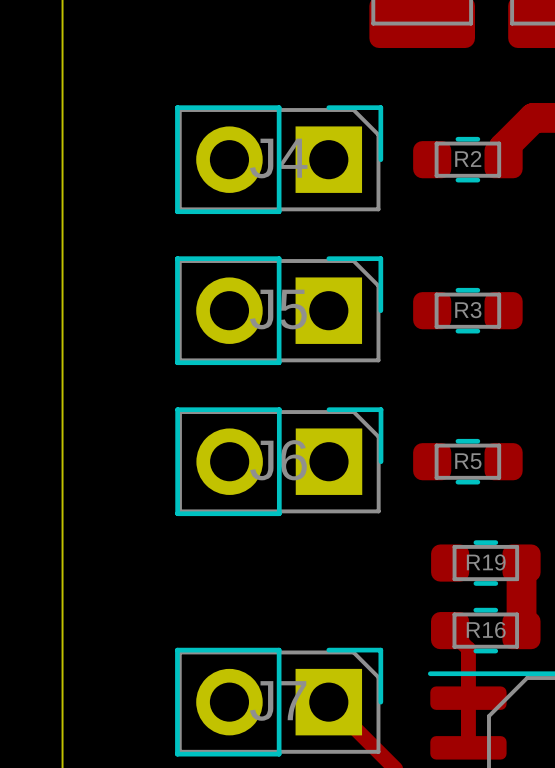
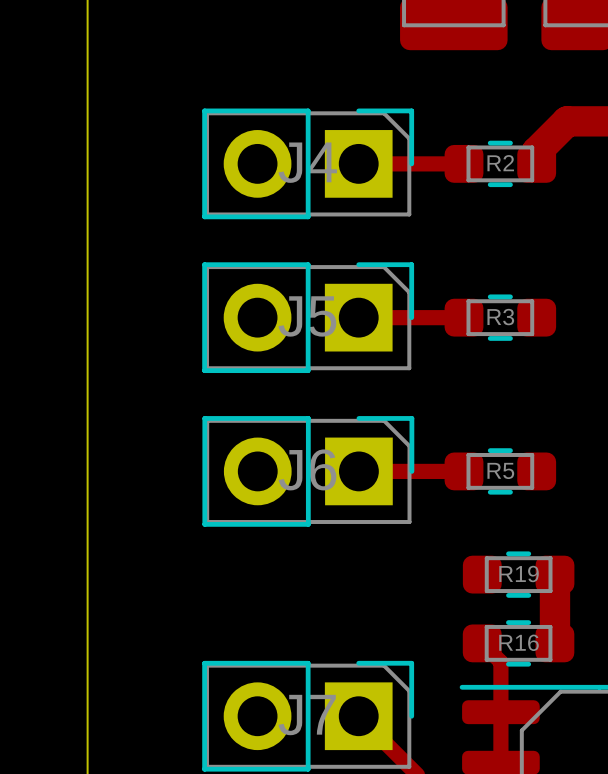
track: none -> (358, 163) (464, 163)
track: none -> (358, 317) (464, 317)
track: none -> (358, 471) (464, 471)

